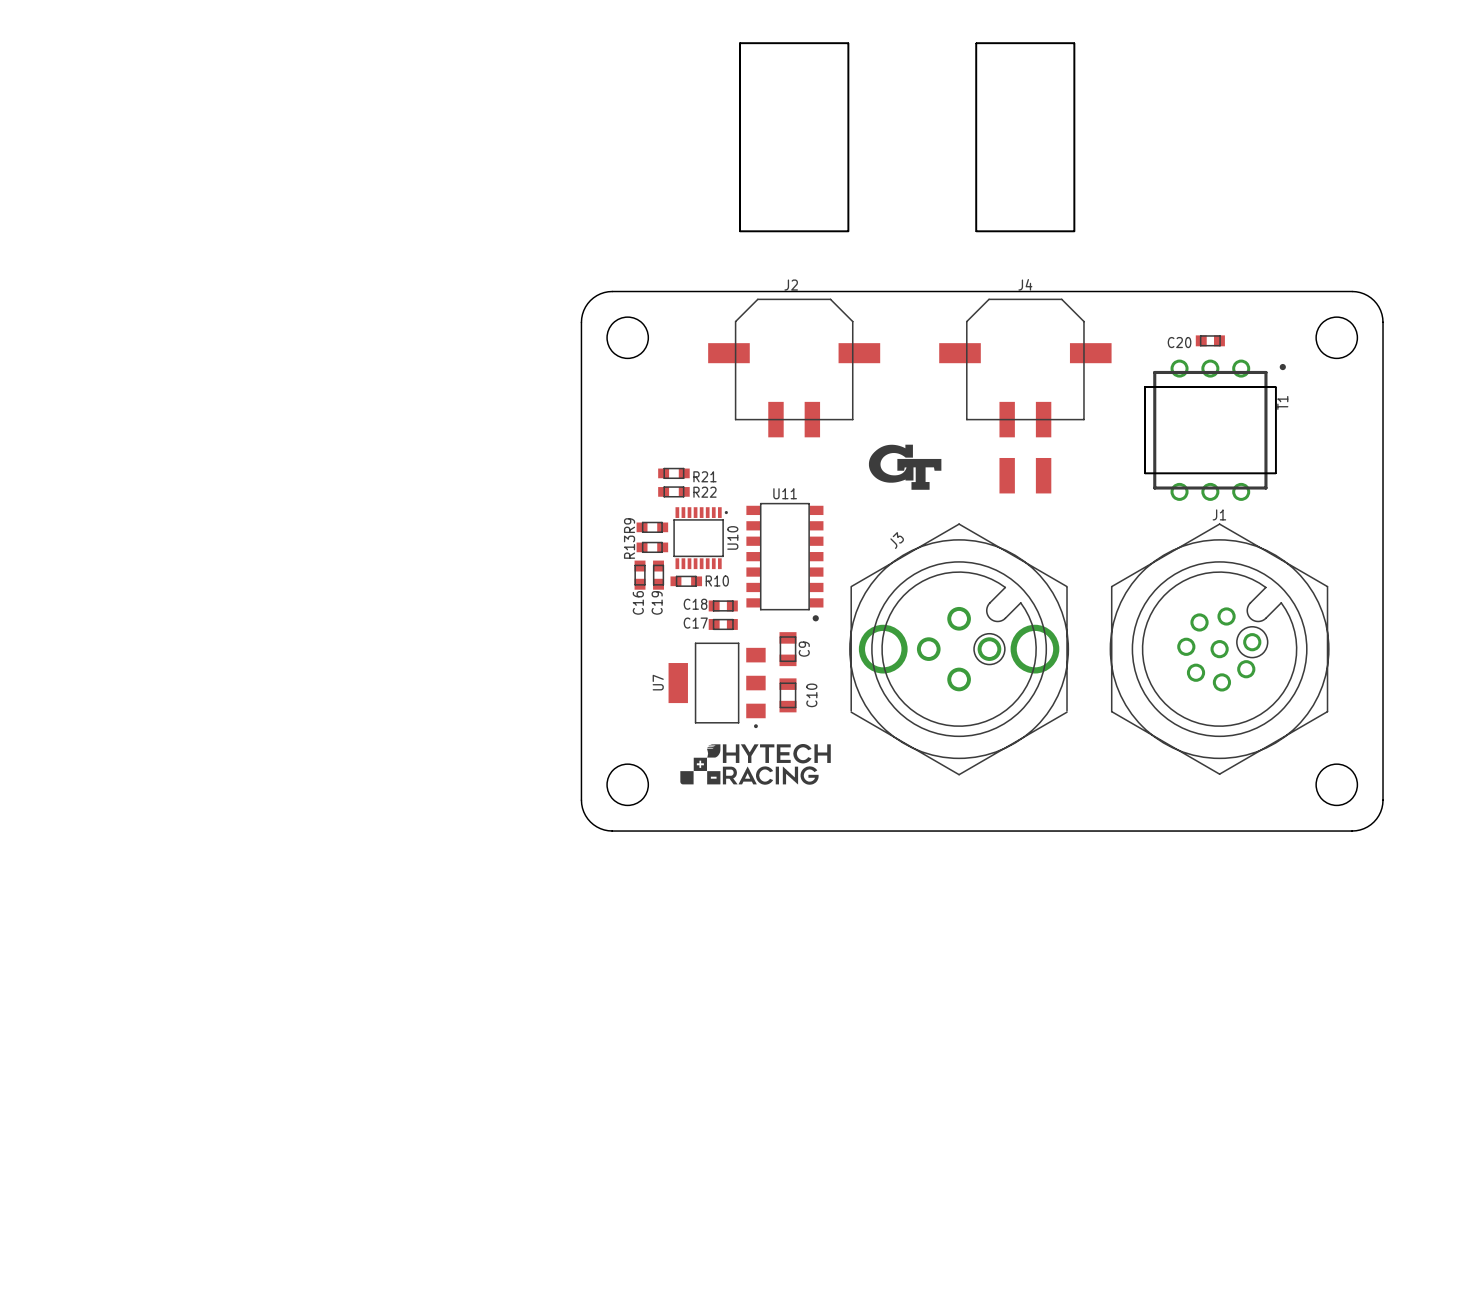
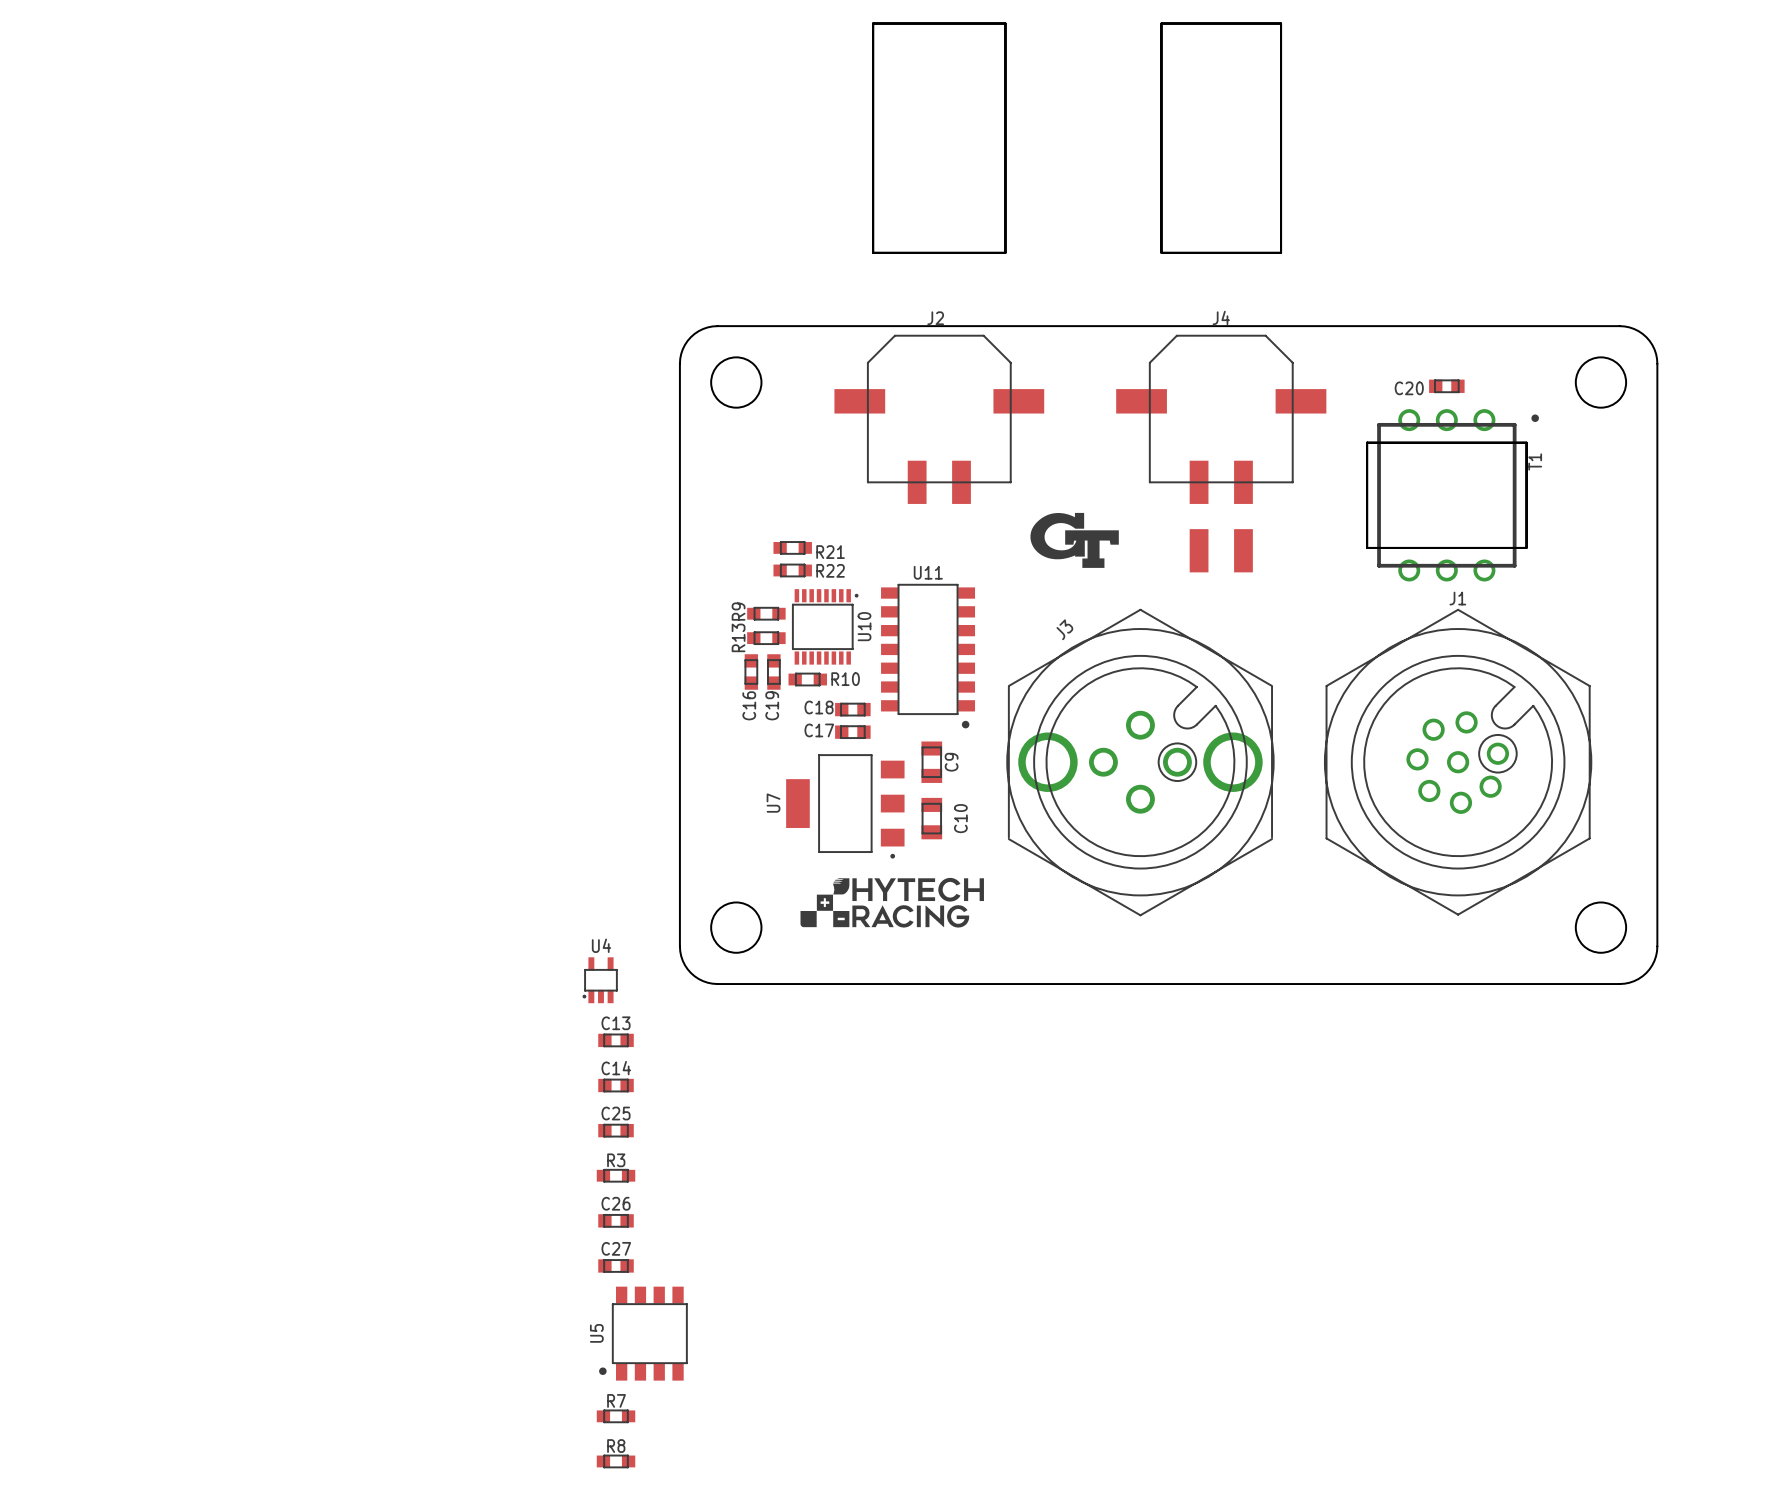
U4: none -> (600, 980)
C13: none -> (616, 1040)
C14: none -> (616, 1085)
C25: none -> (616, 1130)
R3: none -> (616, 1175)
C26: none -> (616, 1220)
C27: none -> (616, 1265)
U5: none -> (643, 1333)
R7: none -> (616, 1416)
R8: none -> (616, 1461)

